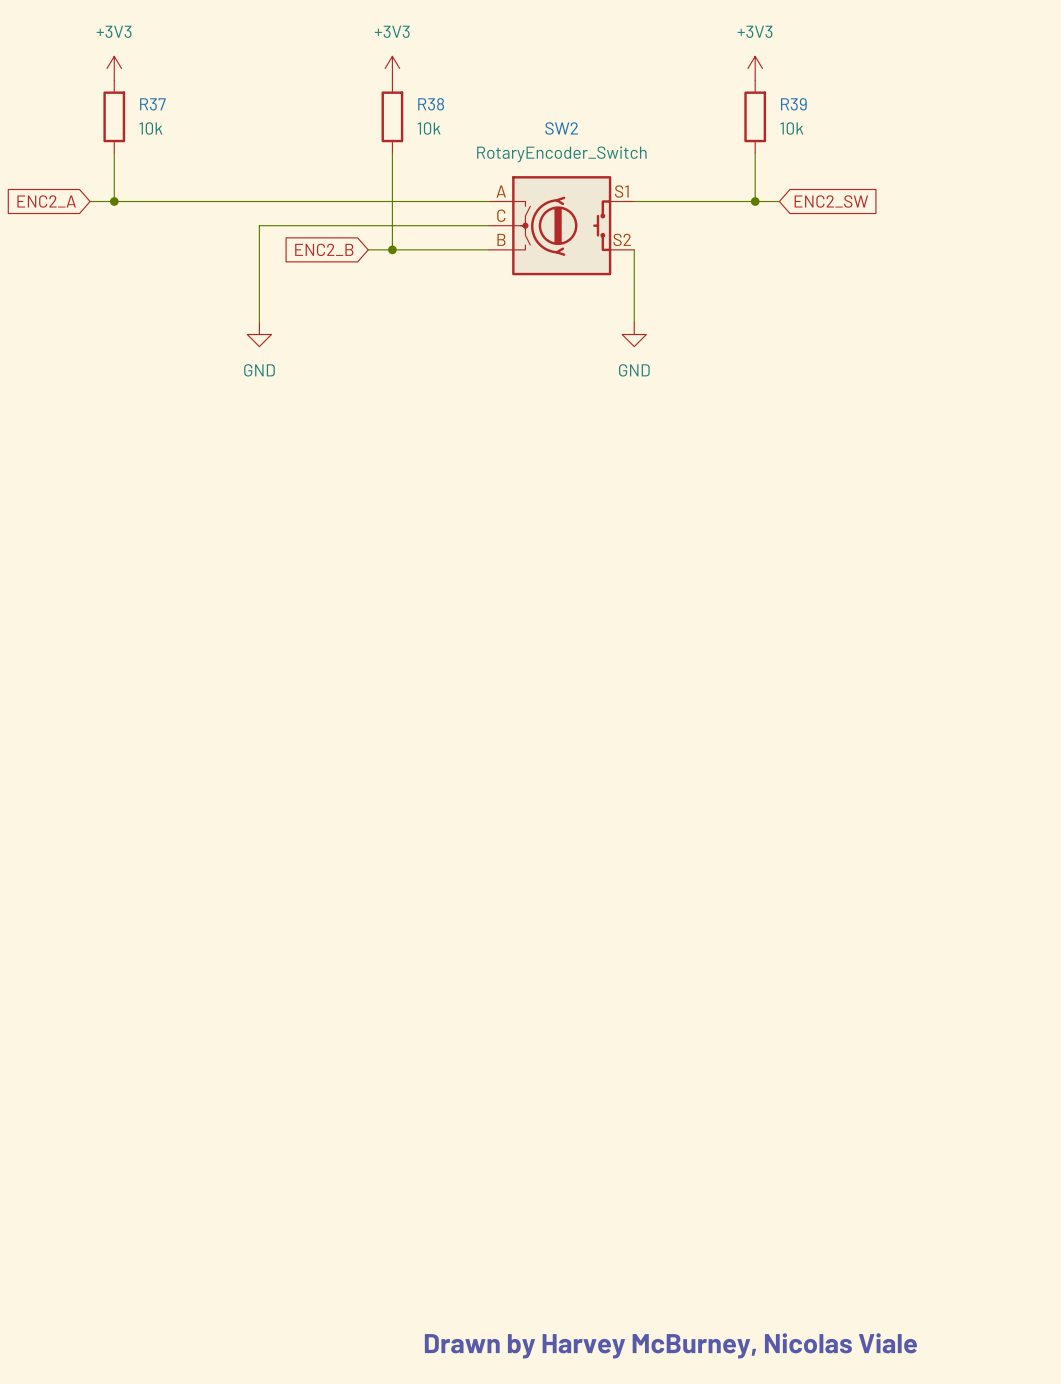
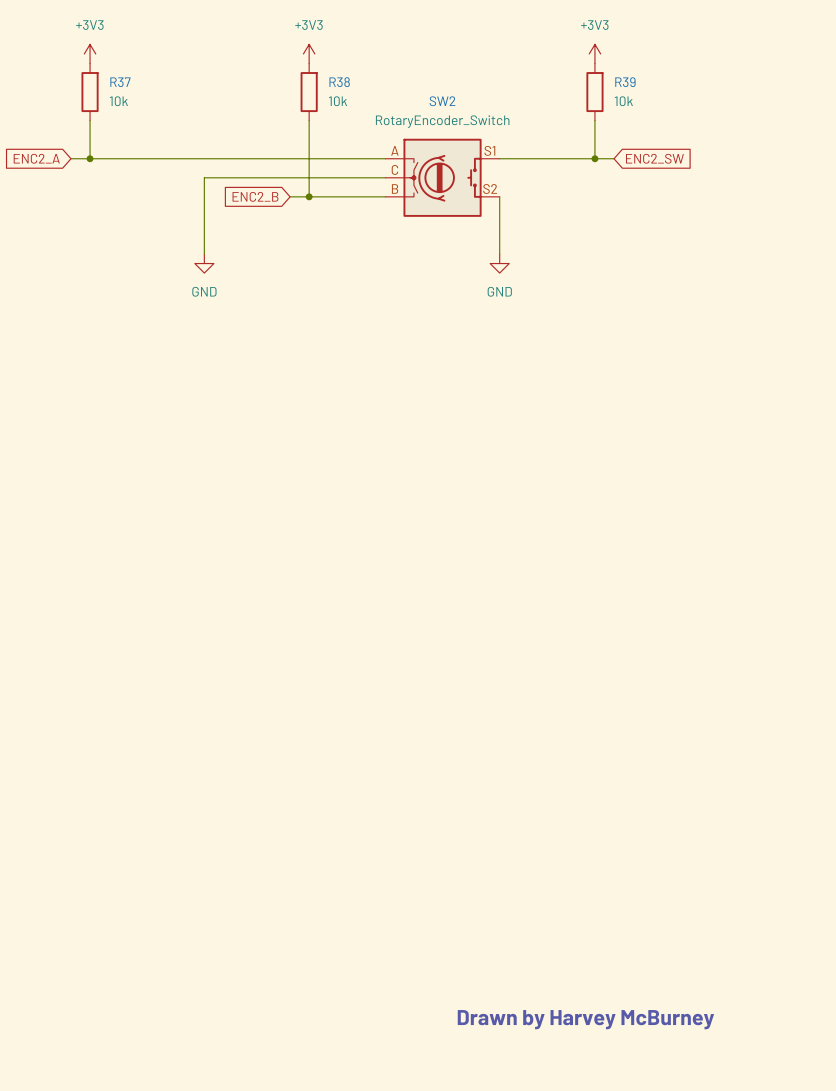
text: none -> Drawn by Harvey McBurney (585, 1019)
text: Drawn by Harvey McBurney, Nicolas Viale (670, 1345) -> none

